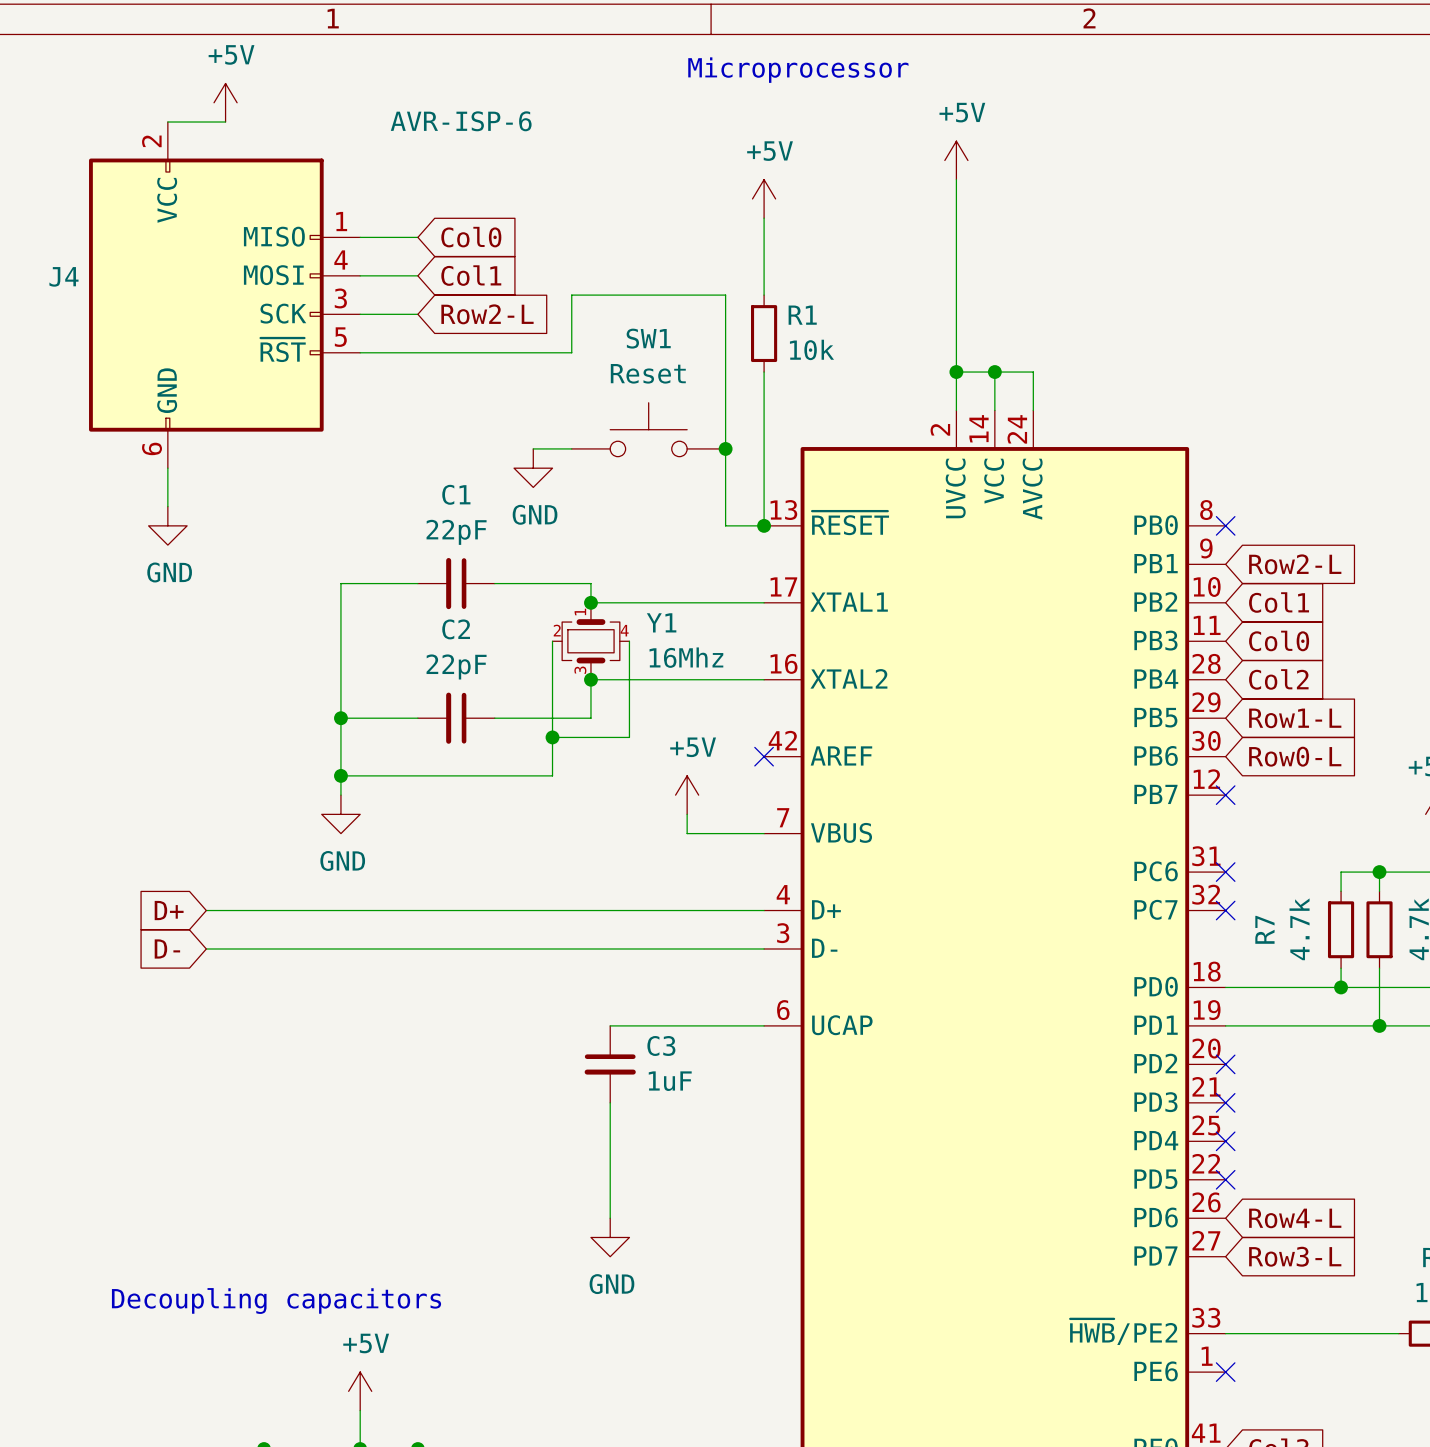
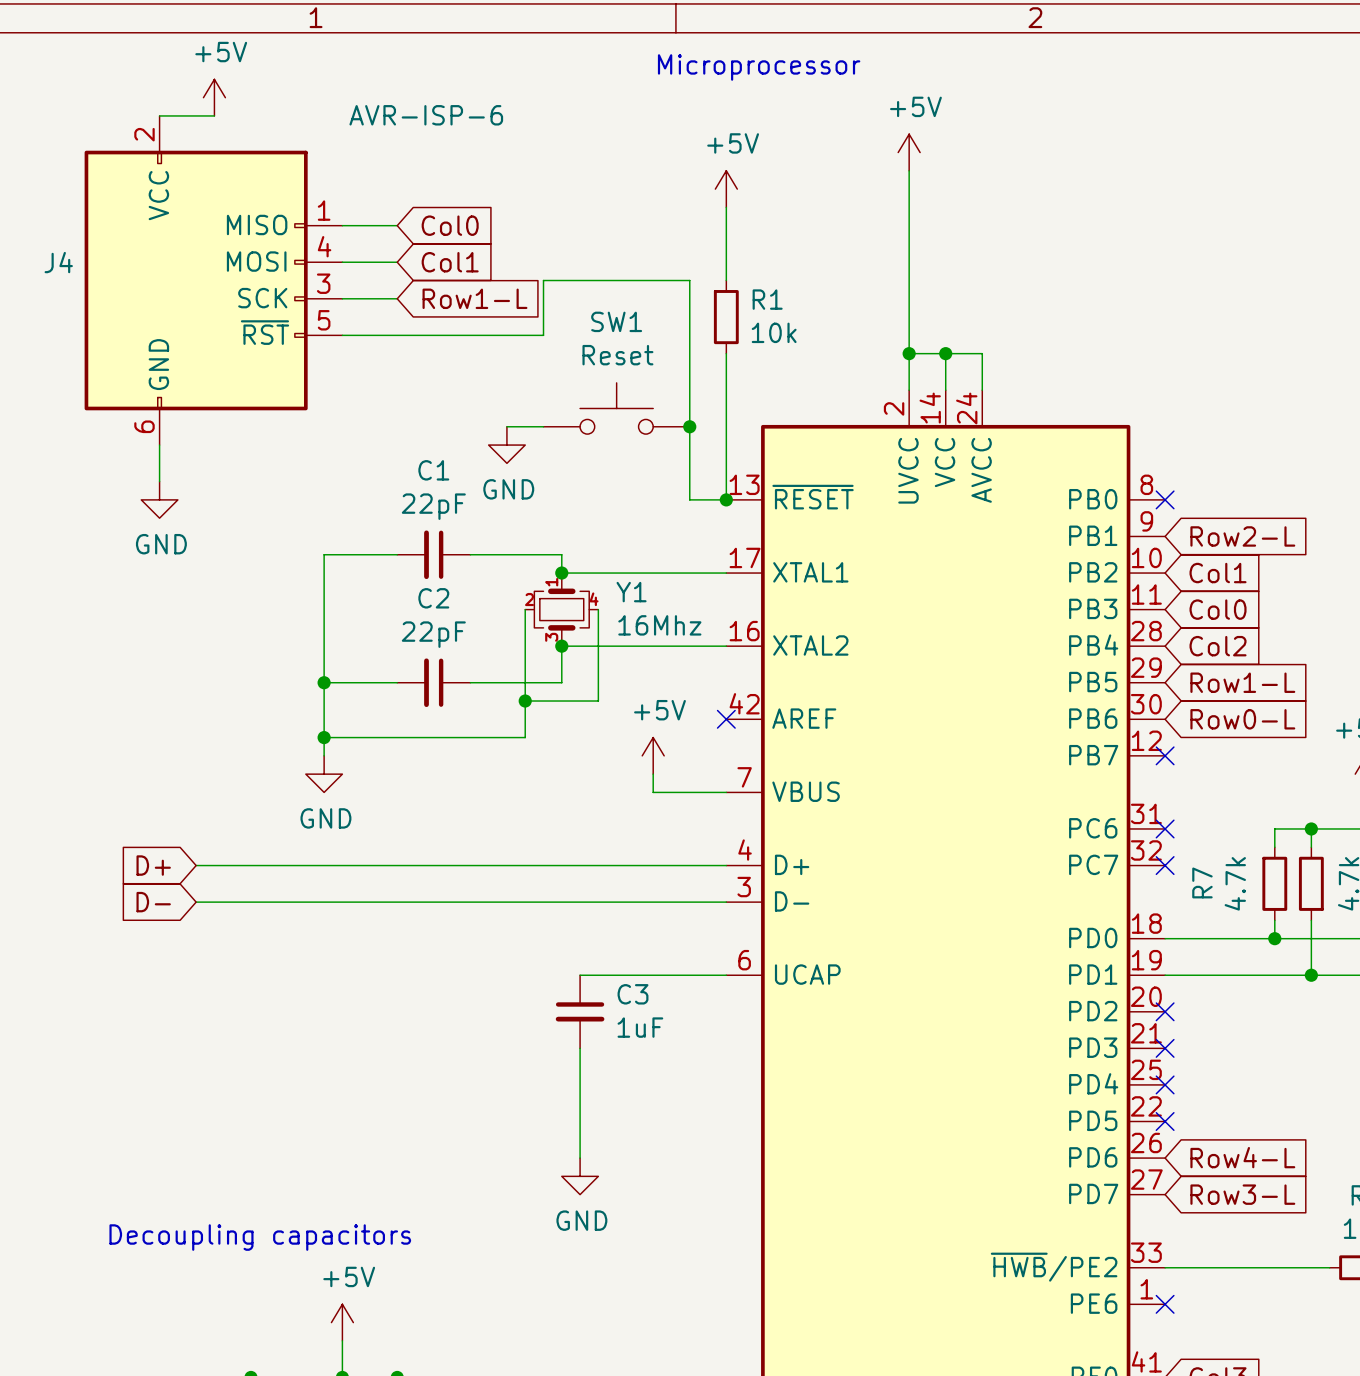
global label: Row2-L (487, 314) -> Row1-L (474, 298)

